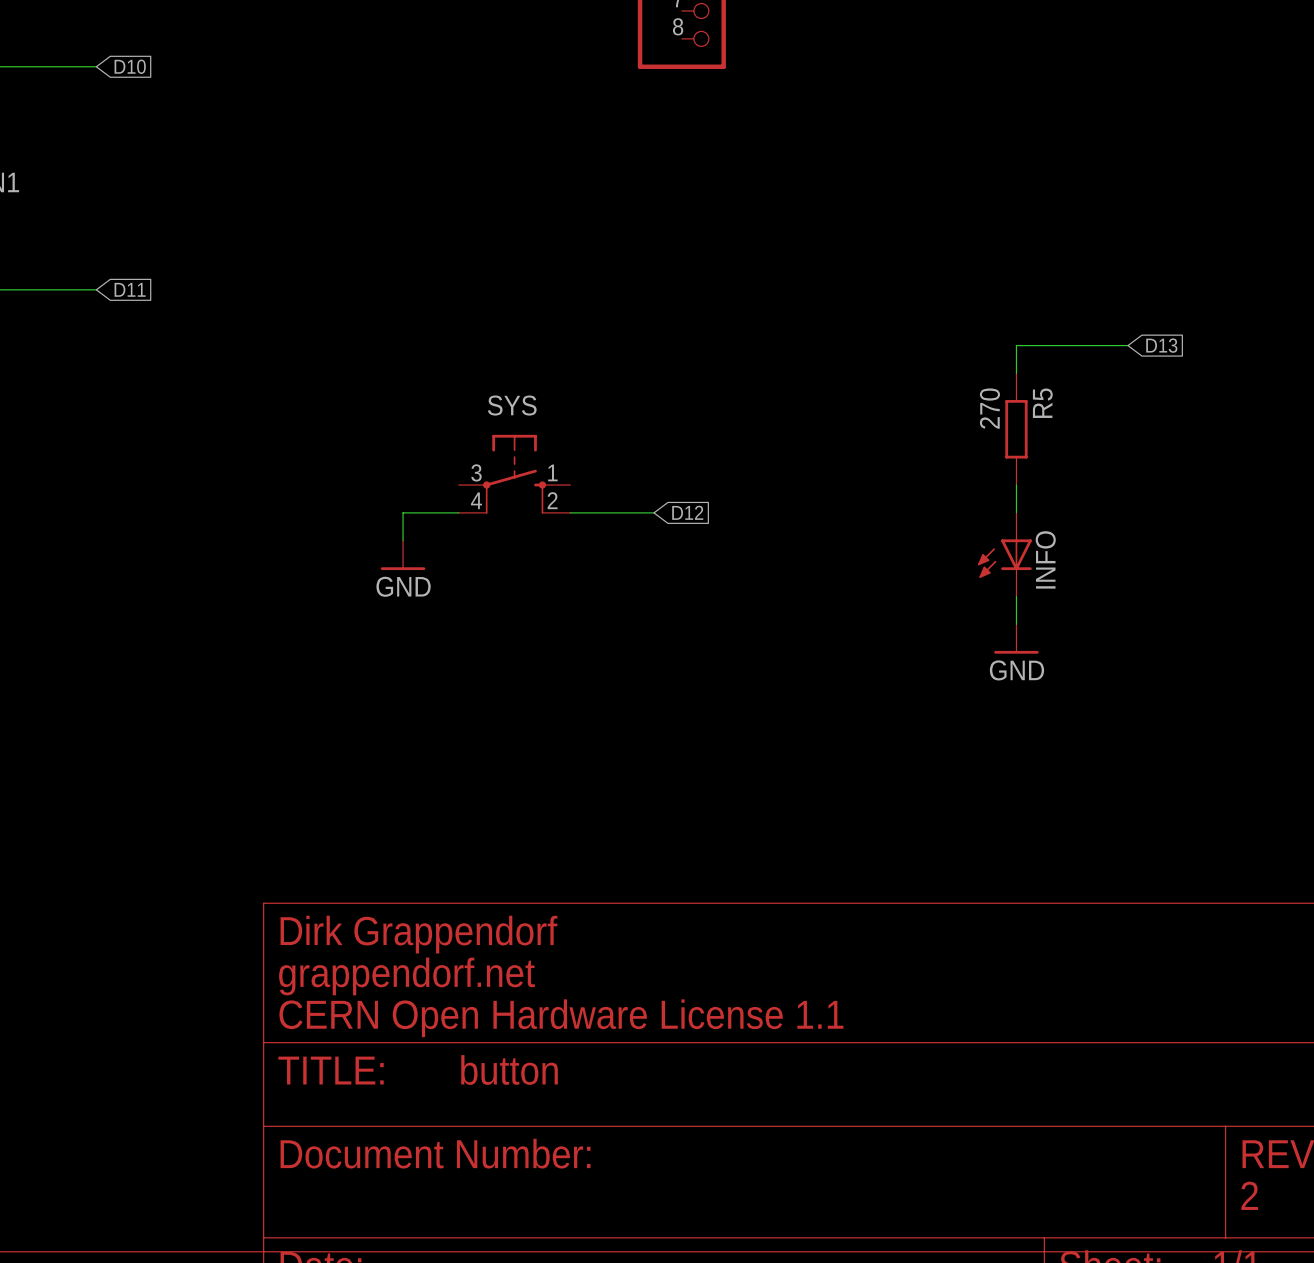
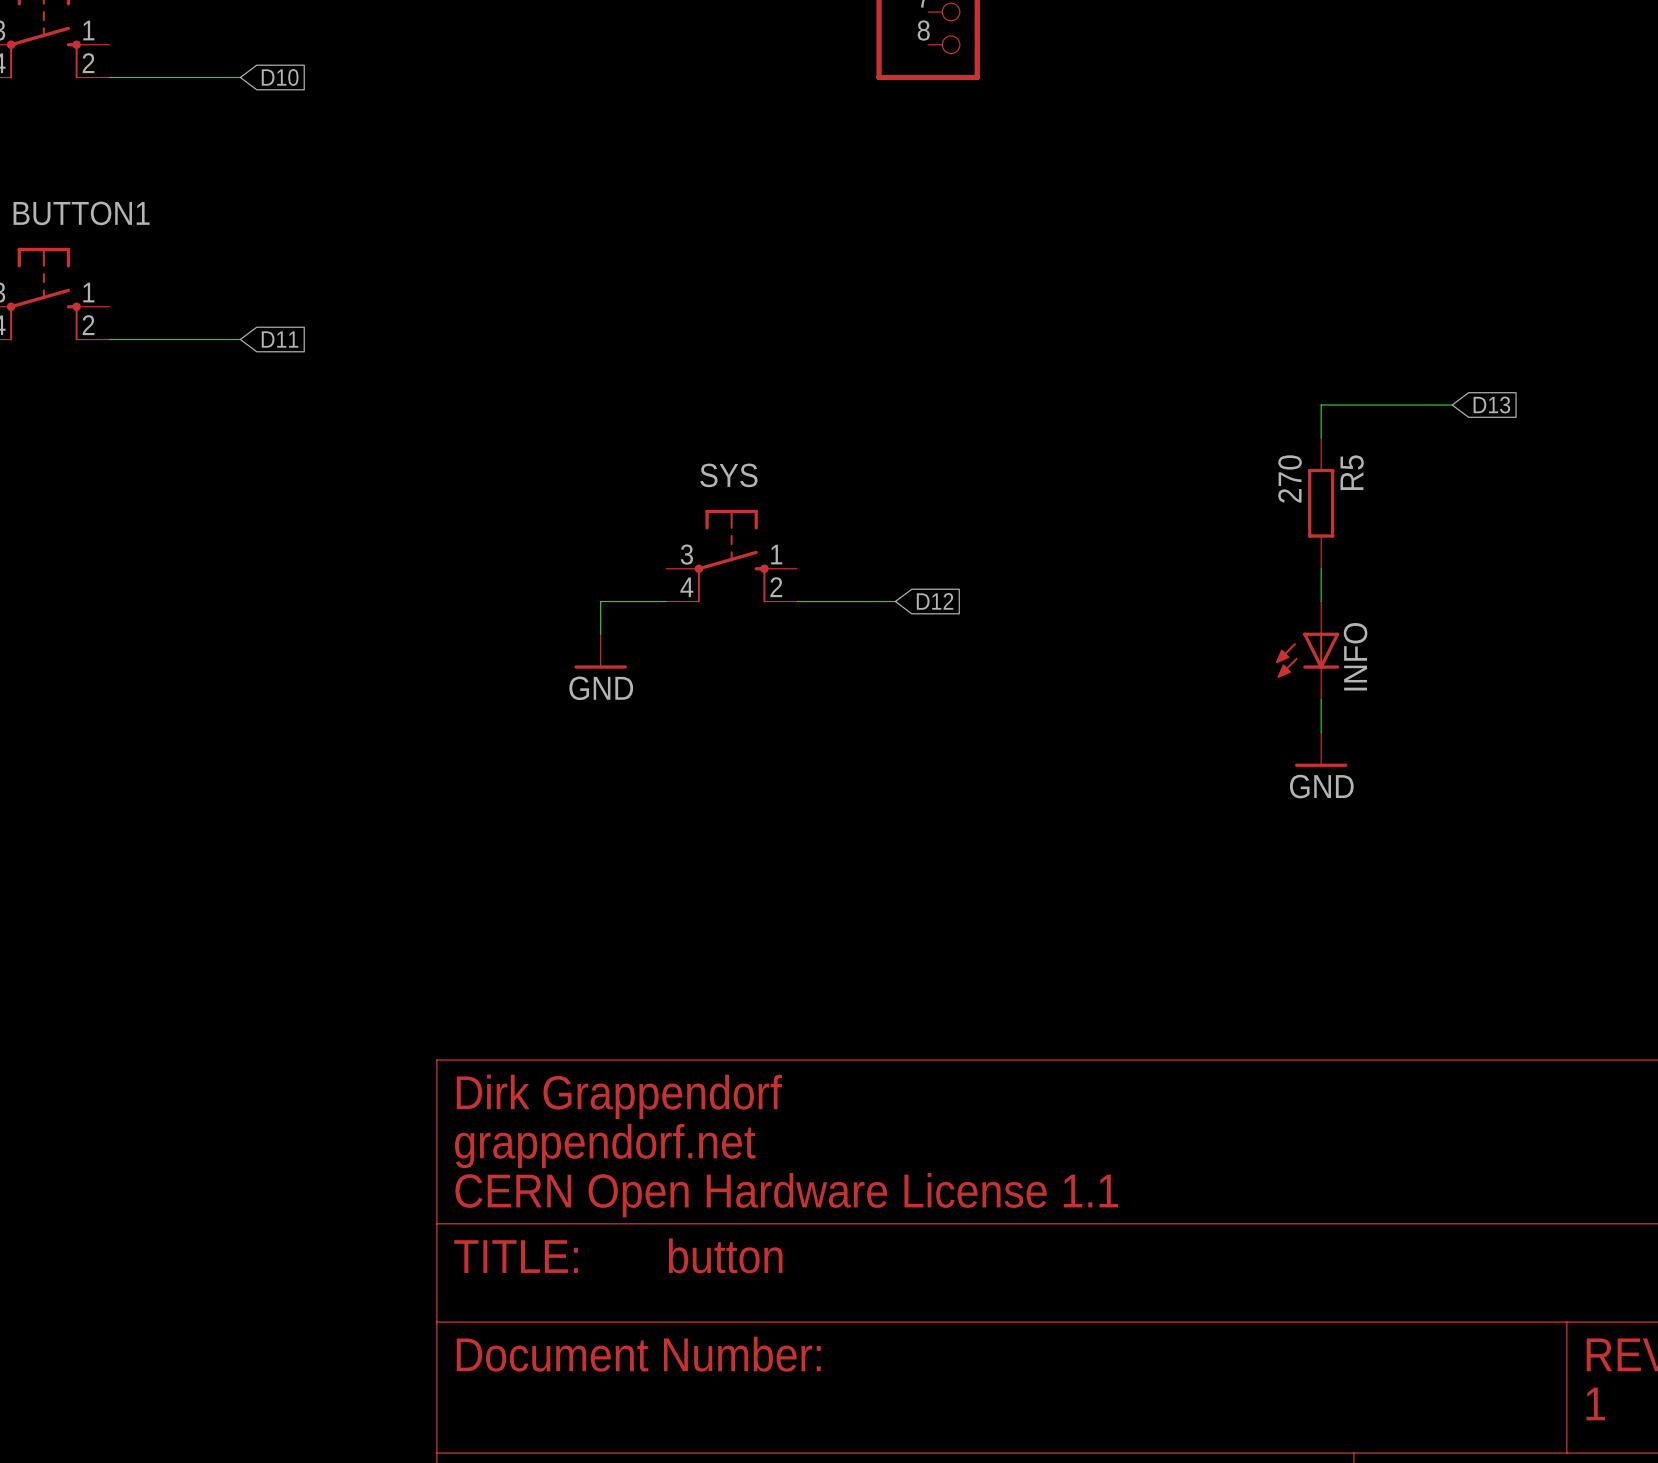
text: 2 (1249, 1195) -> 1 (1595, 1403)

